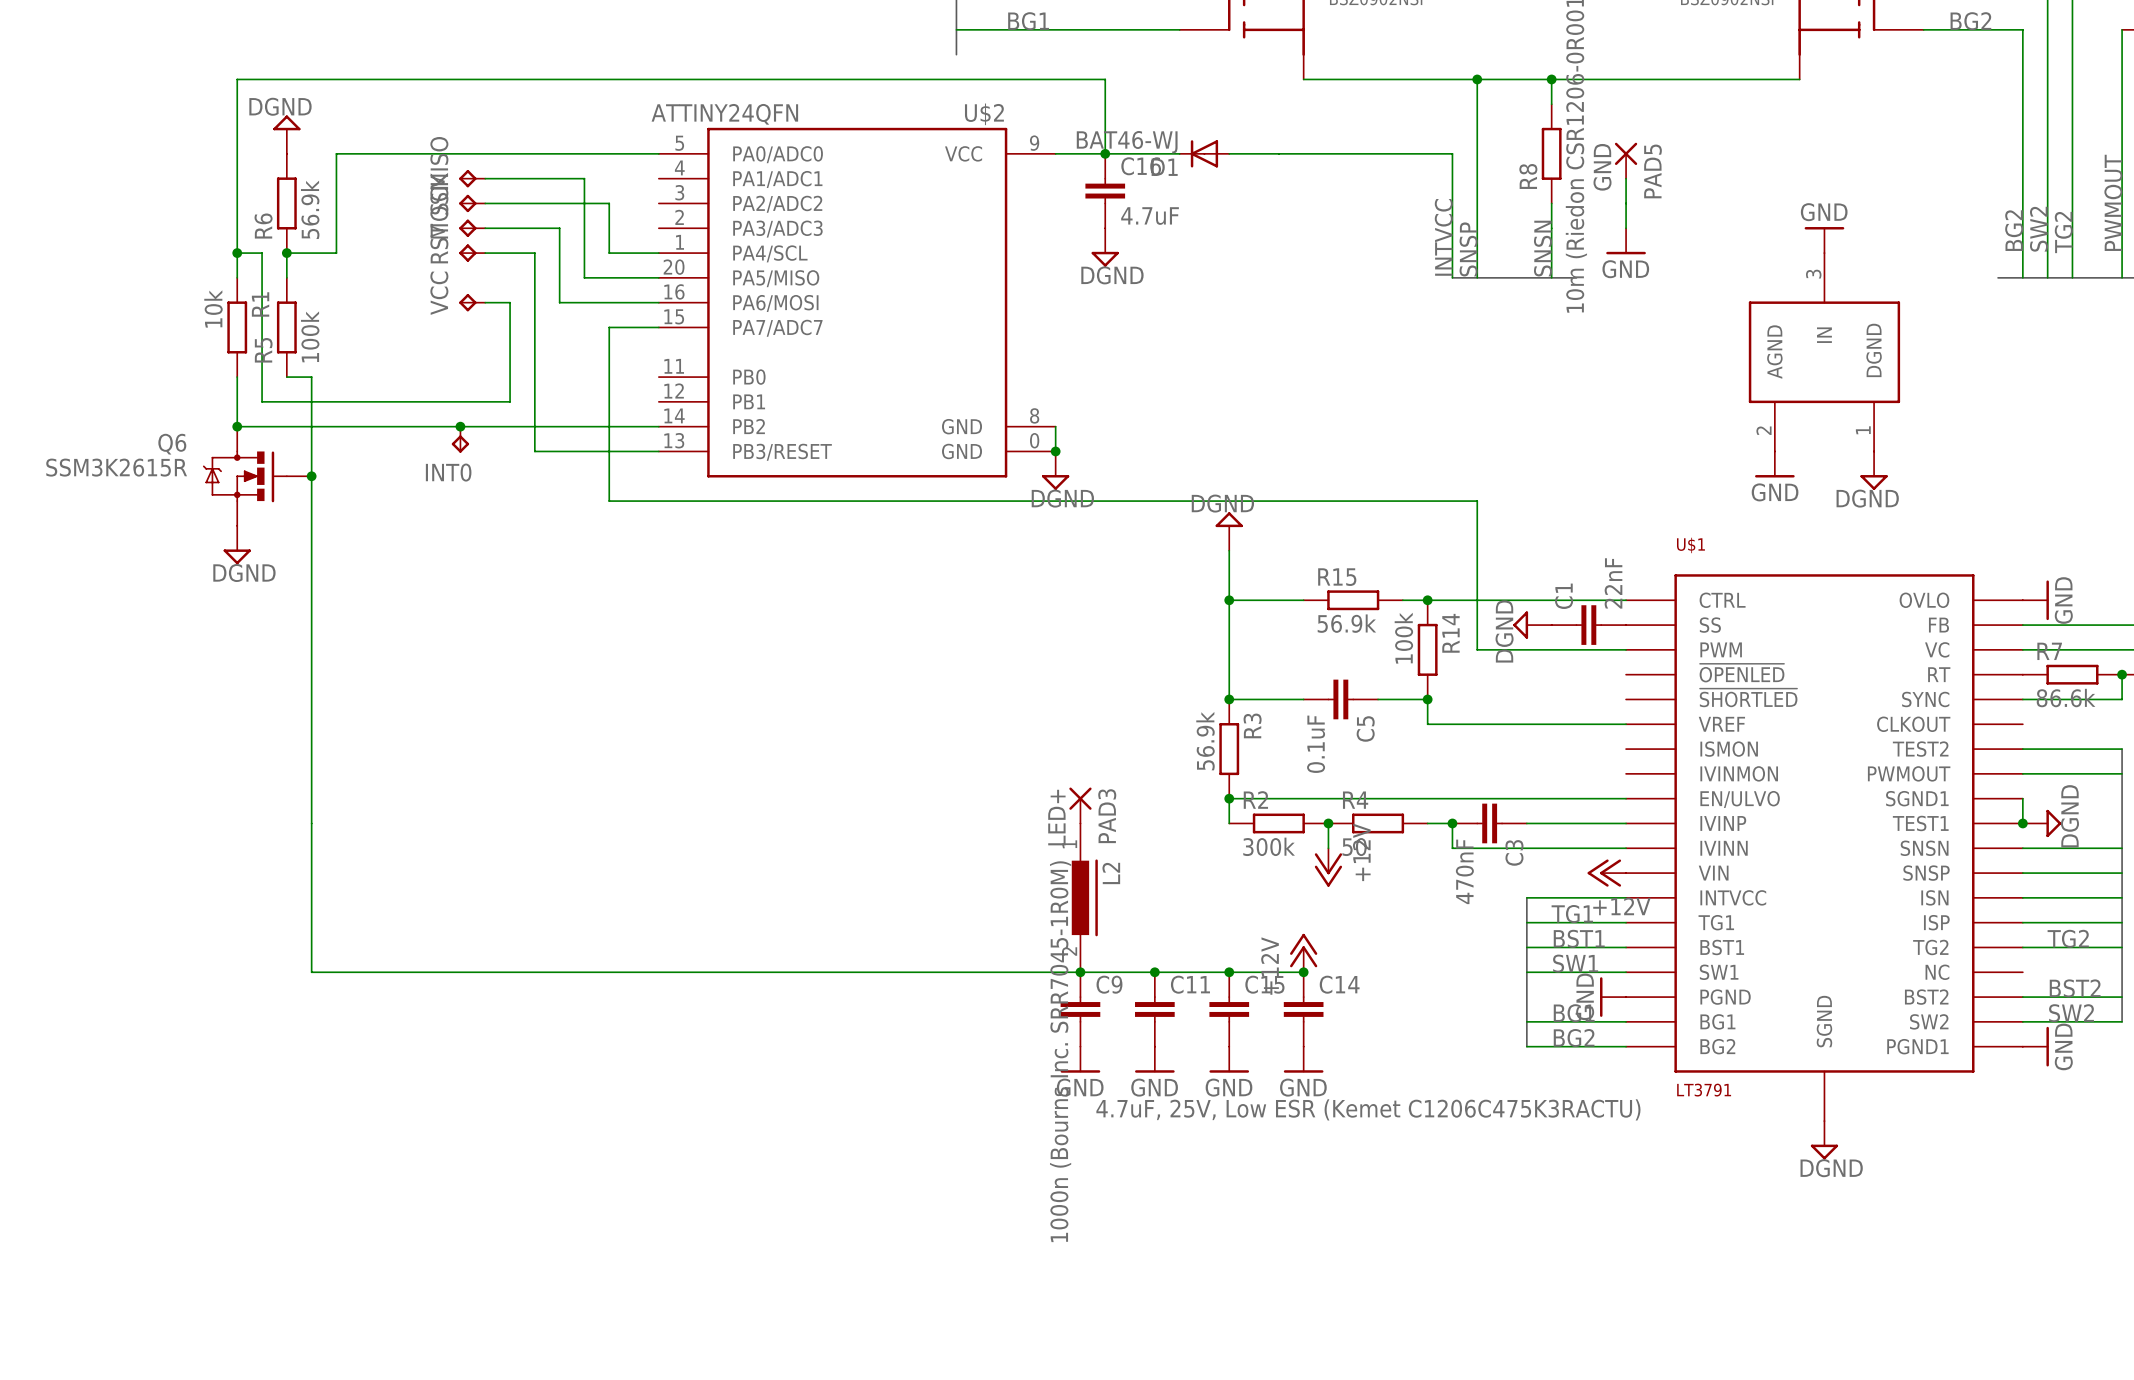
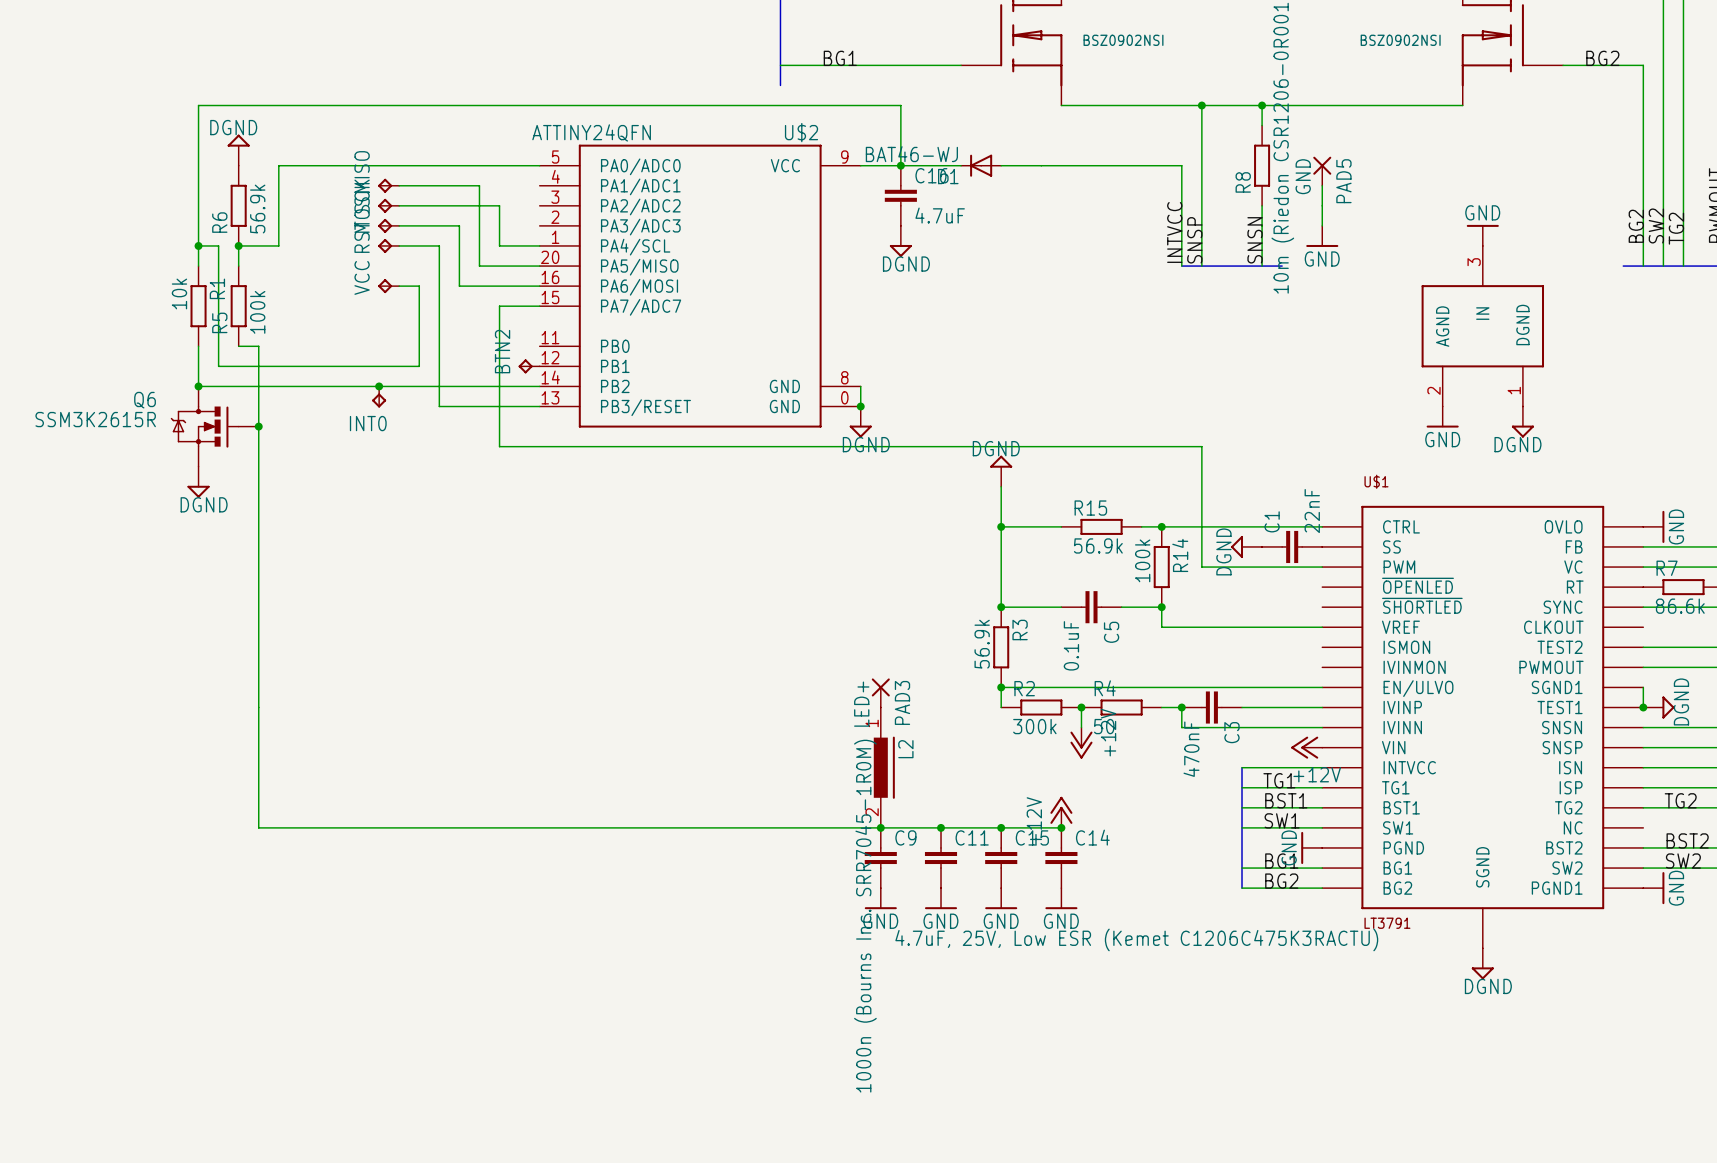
BTN2: none -> (529, 366)

